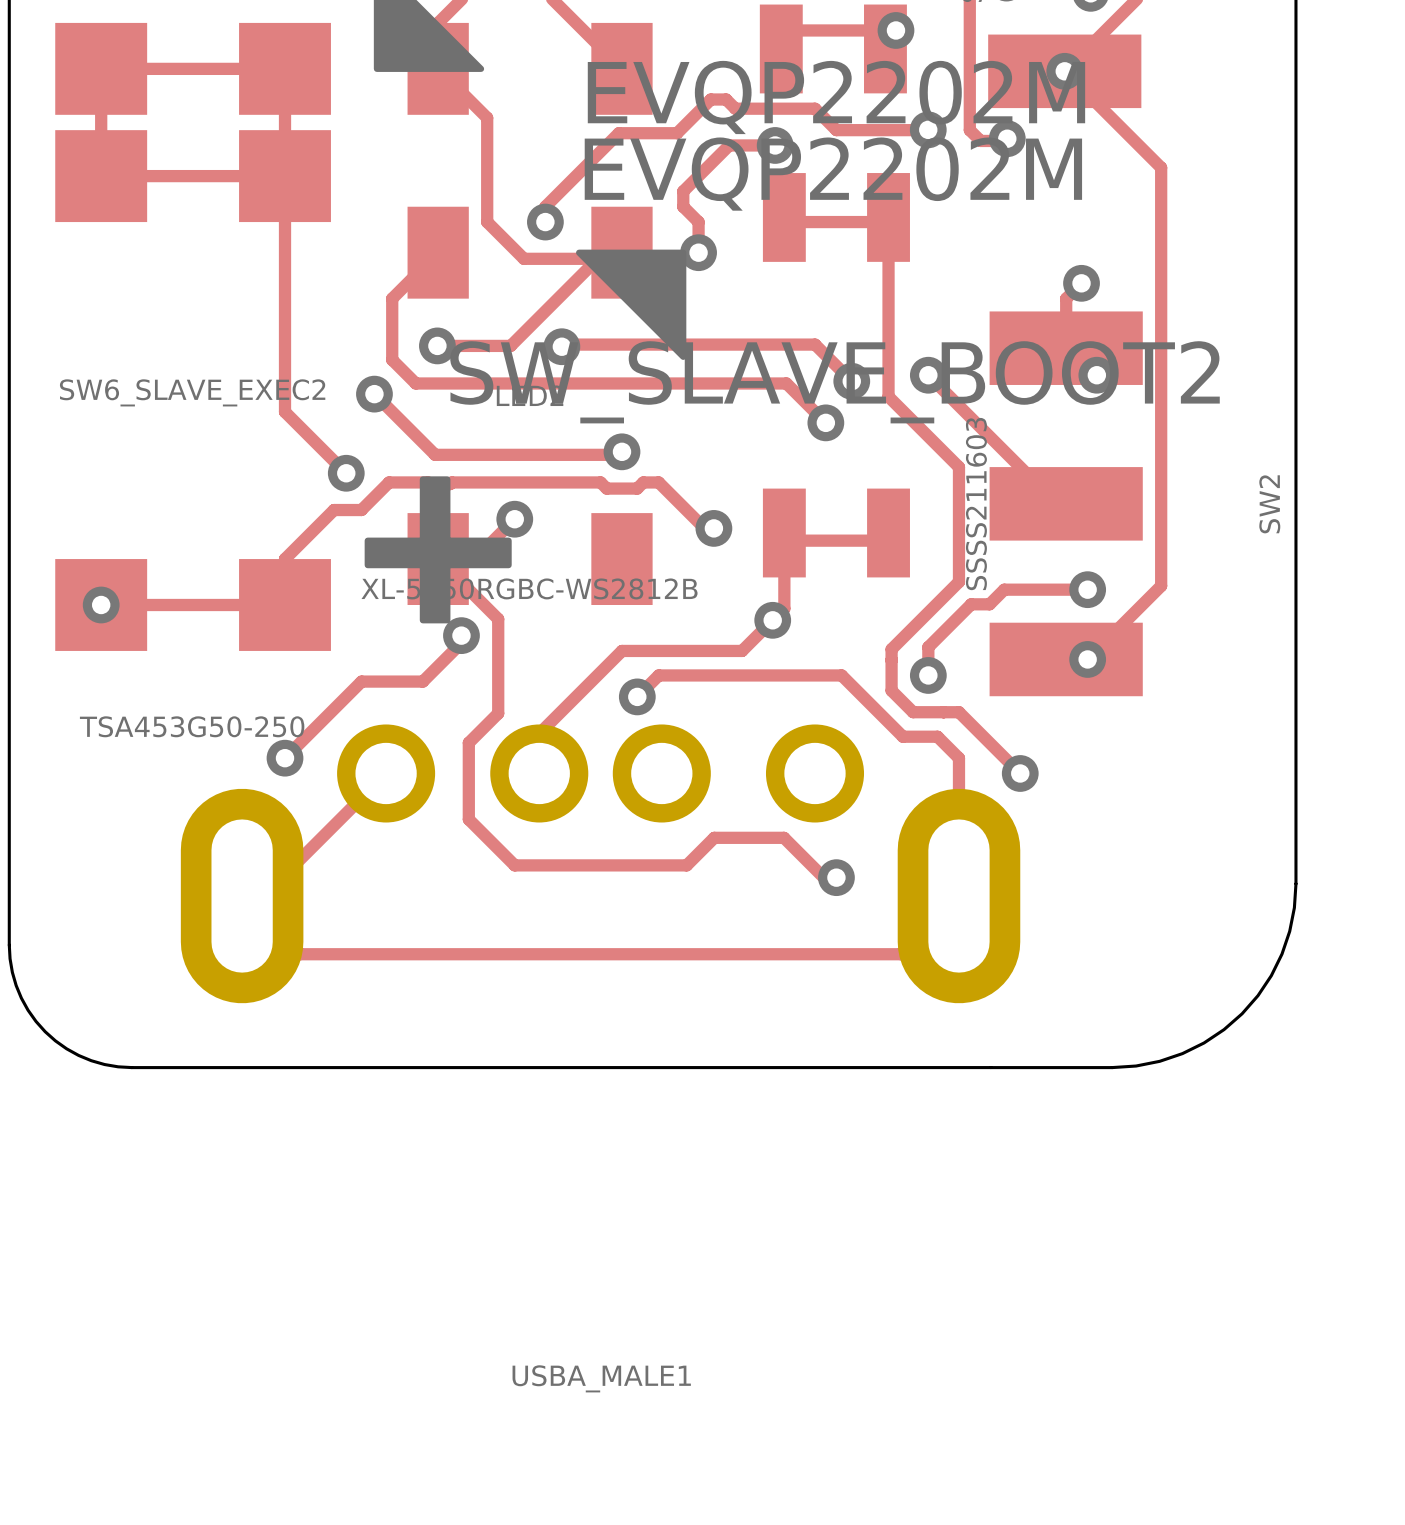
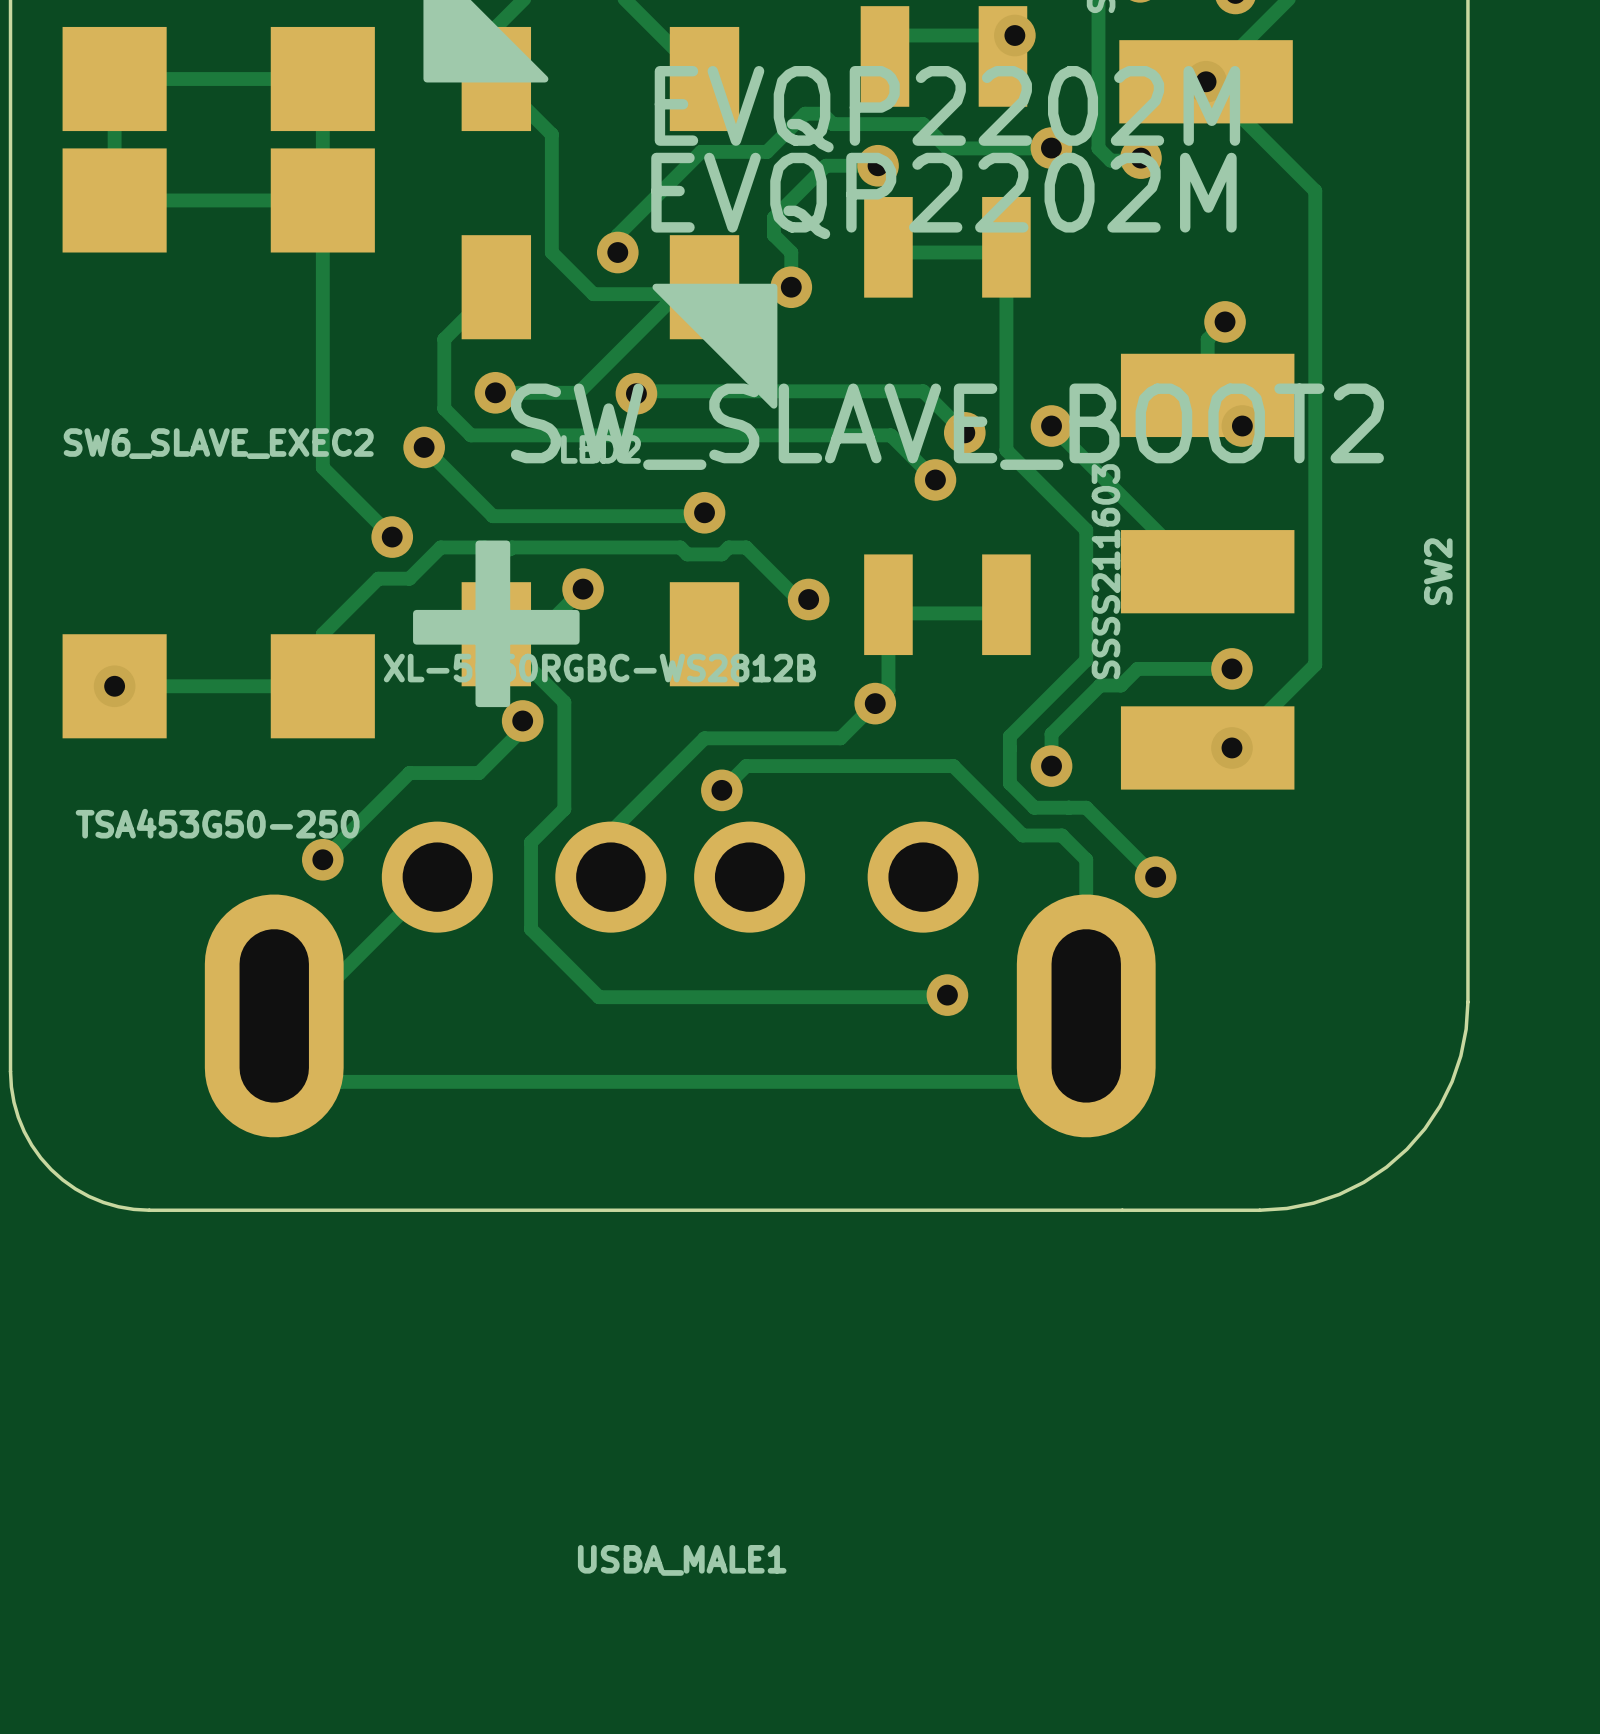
track: (514, 865) (686, 865) (714, 837) (784, 837) (823, 877) -> (583, 981) (599, 997) (931, 997) (933, 995)

